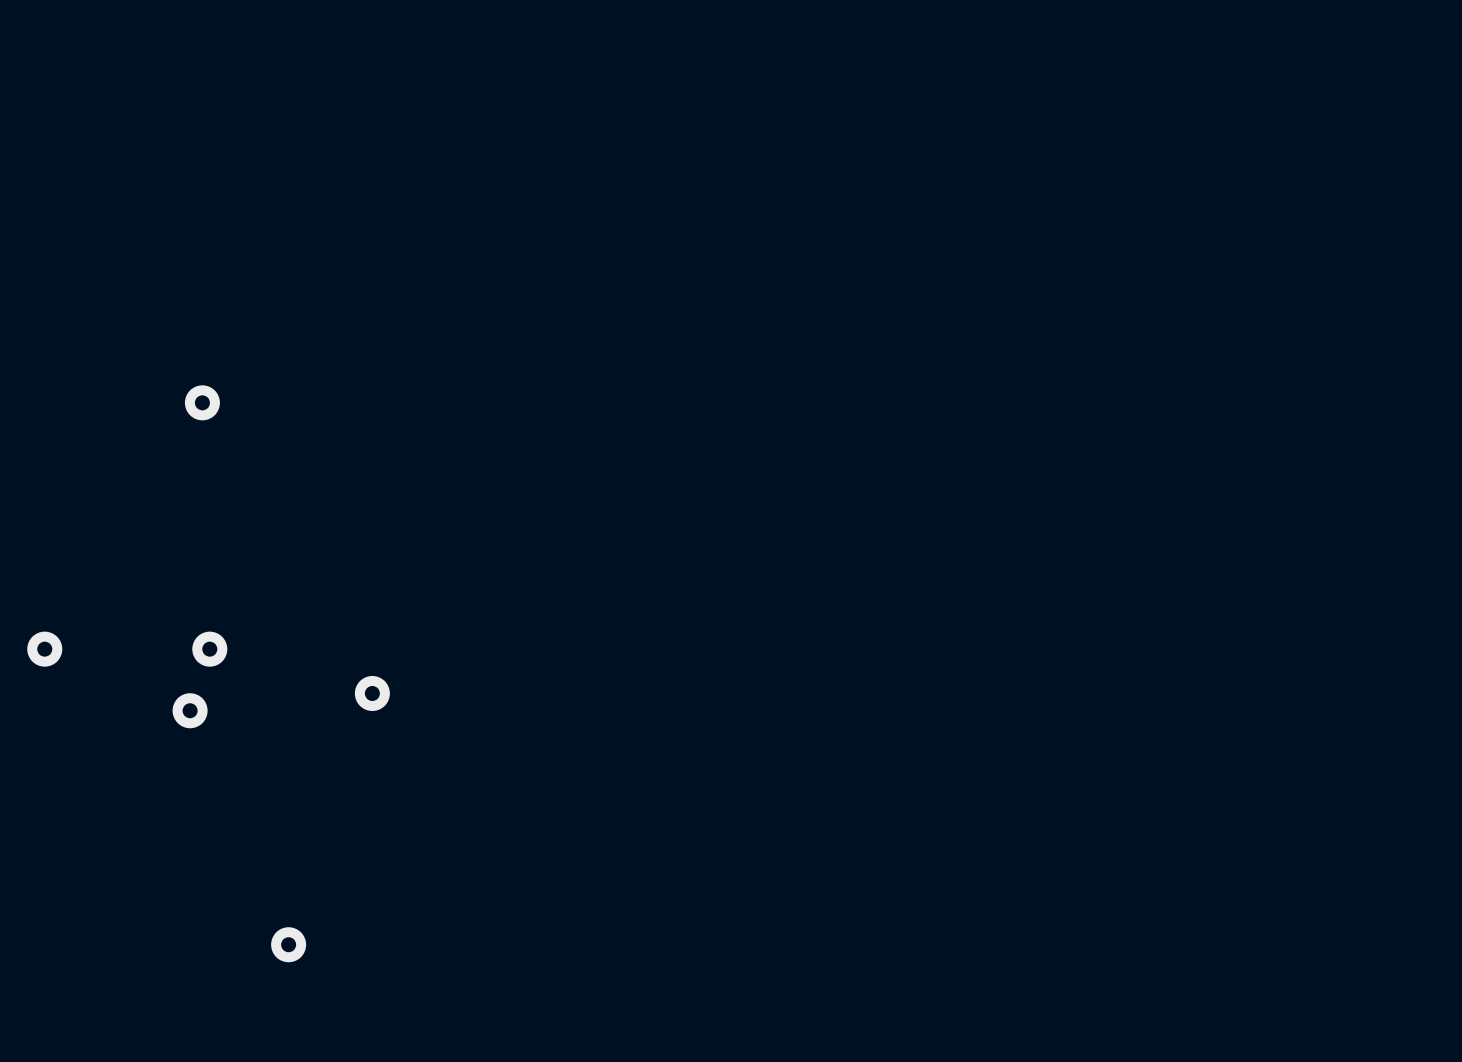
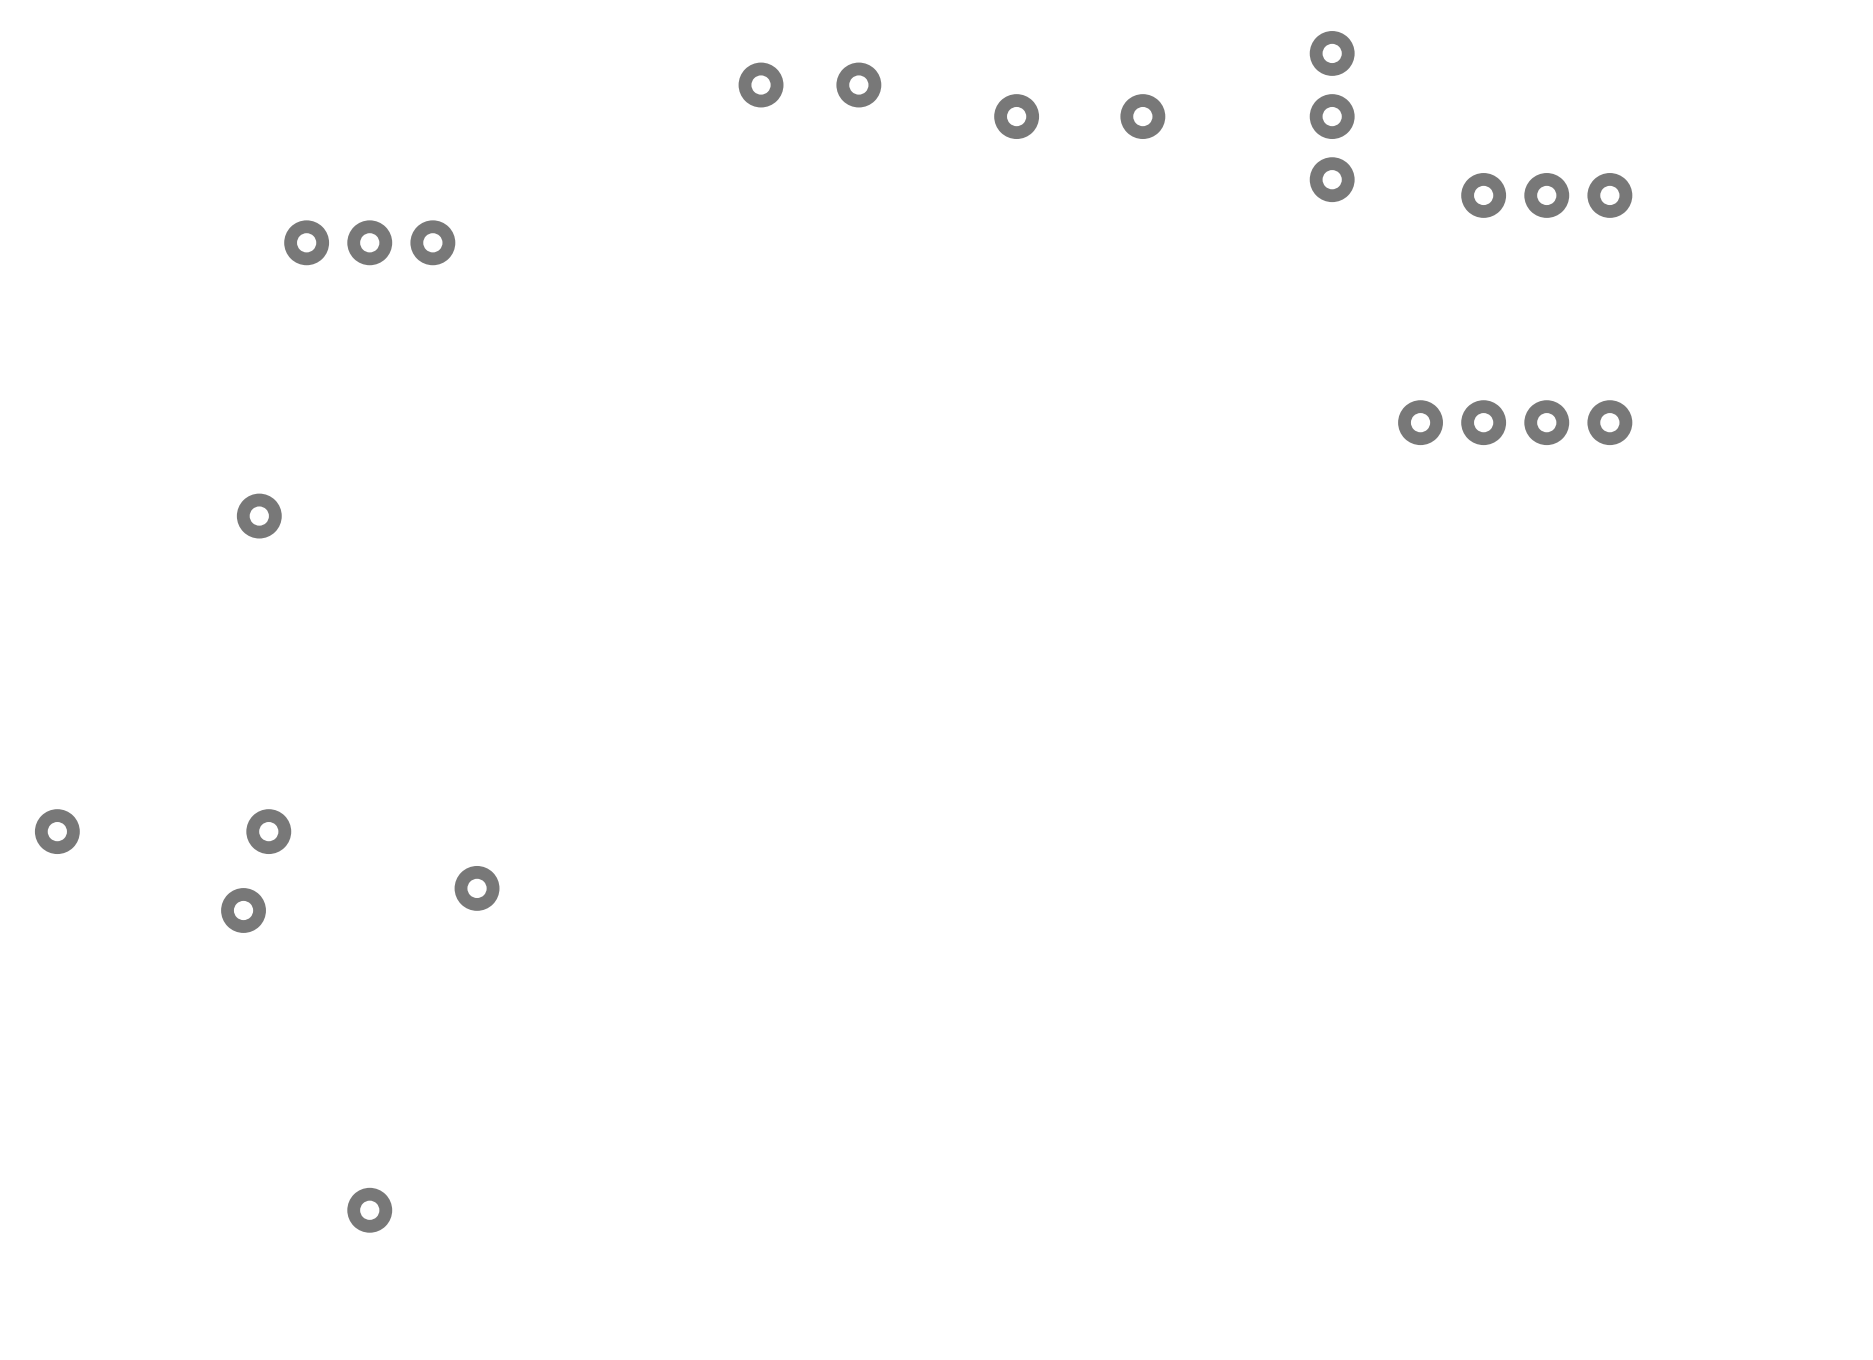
via: none -> (1332, 53)
via: none -> (761, 85)
via: none -> (858, 85)
via: none -> (1016, 116)
via: none -> (1142, 116)
via: none -> (1332, 116)
via: none -> (1332, 179)
via: none -> (1483, 195)
via: none -> (1546, 195)
via: none -> (1609, 195)
via: none -> (306, 242)
via: none -> (369, 242)
via: none -> (432, 242)
via: none -> (1420, 422)
via: none -> (1483, 422)
via: none -> (1546, 422)
via: none -> (1609, 422)

